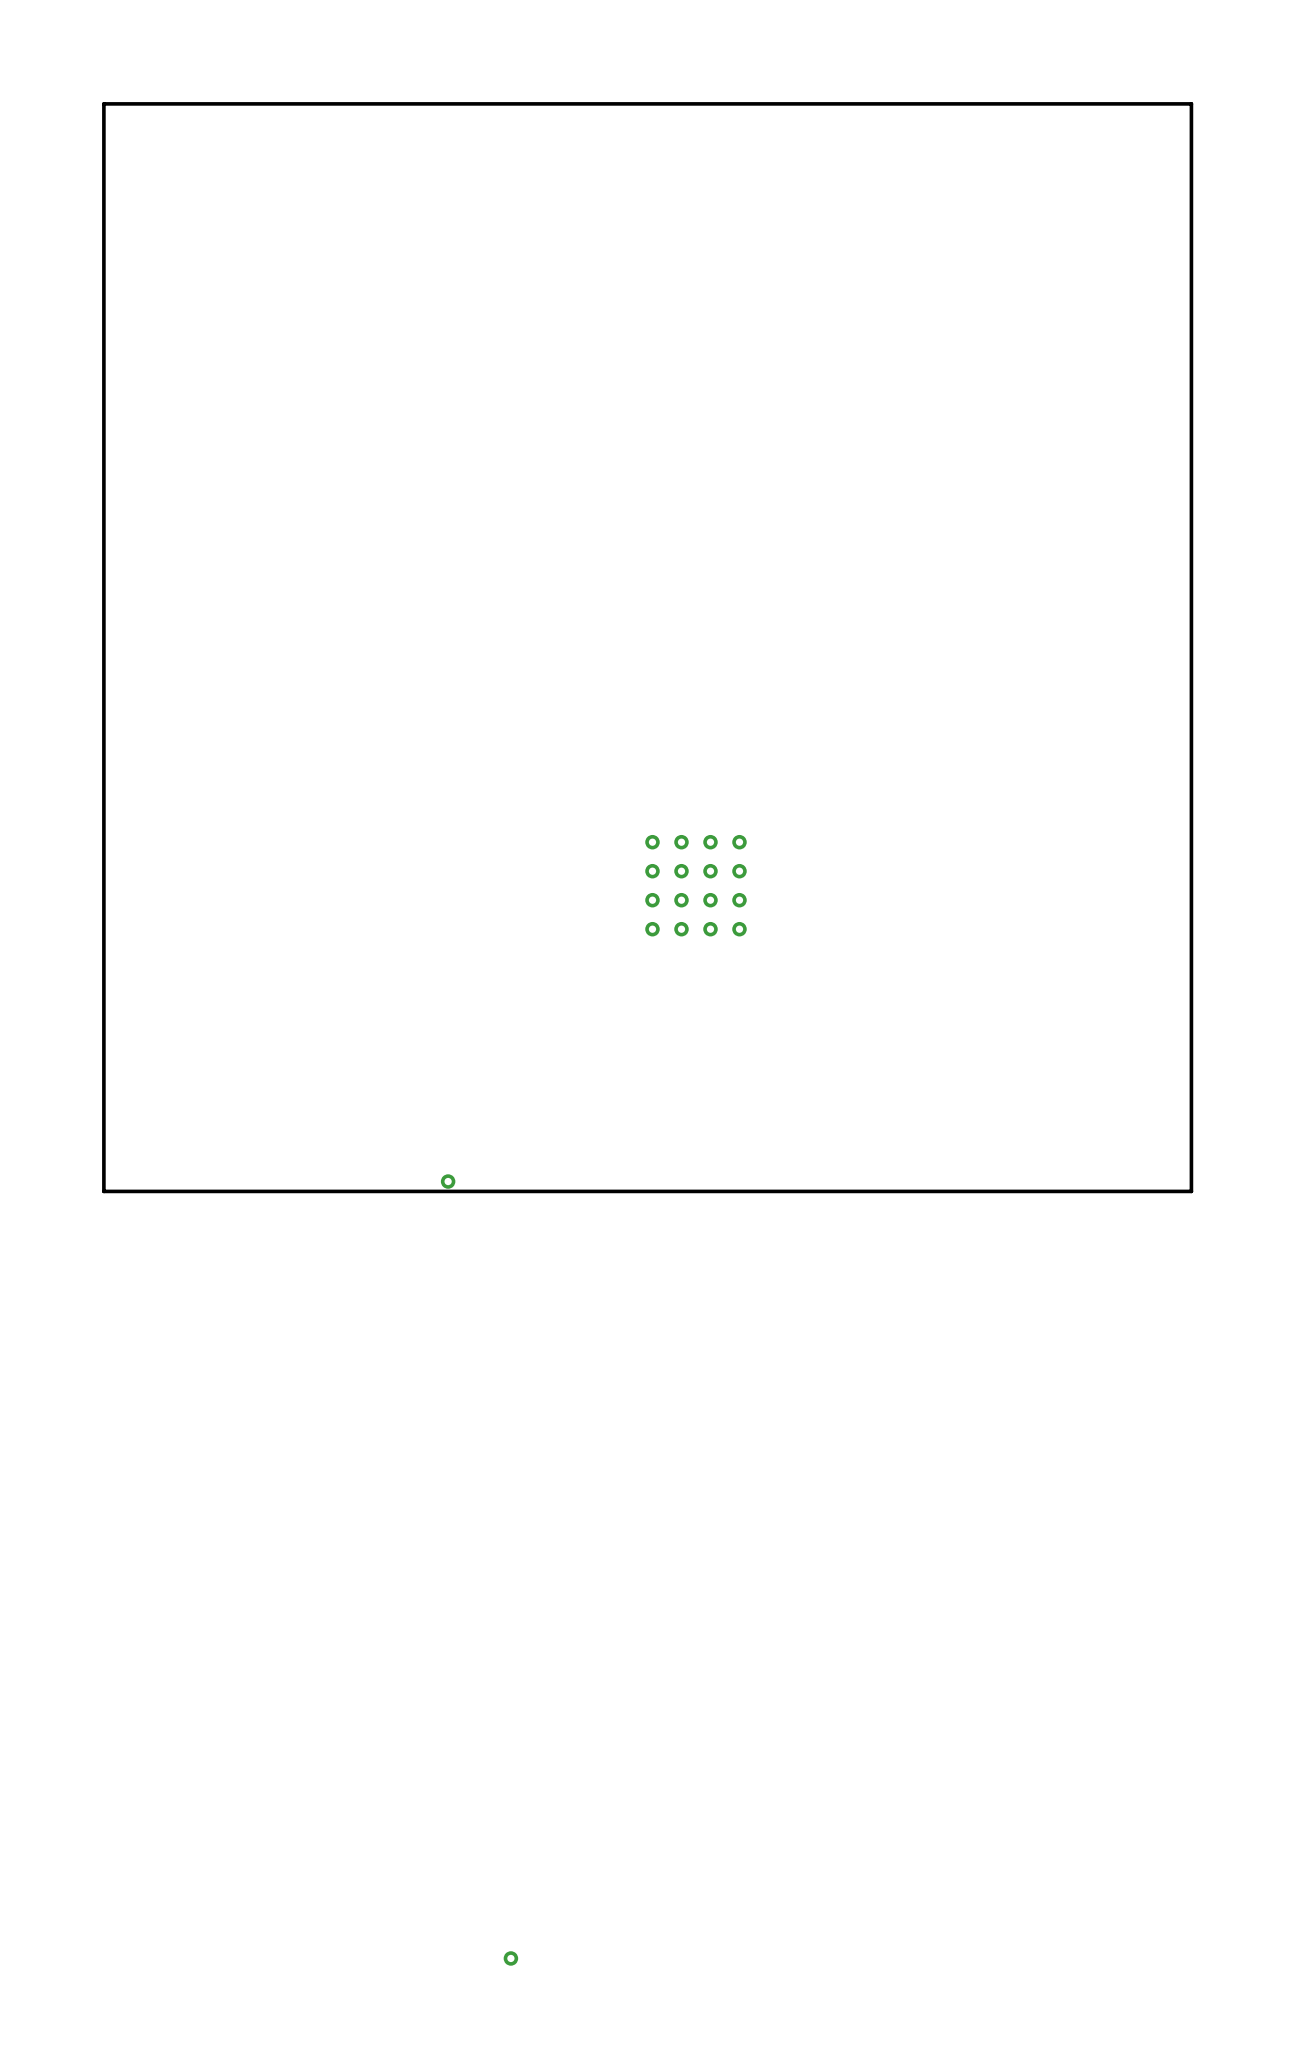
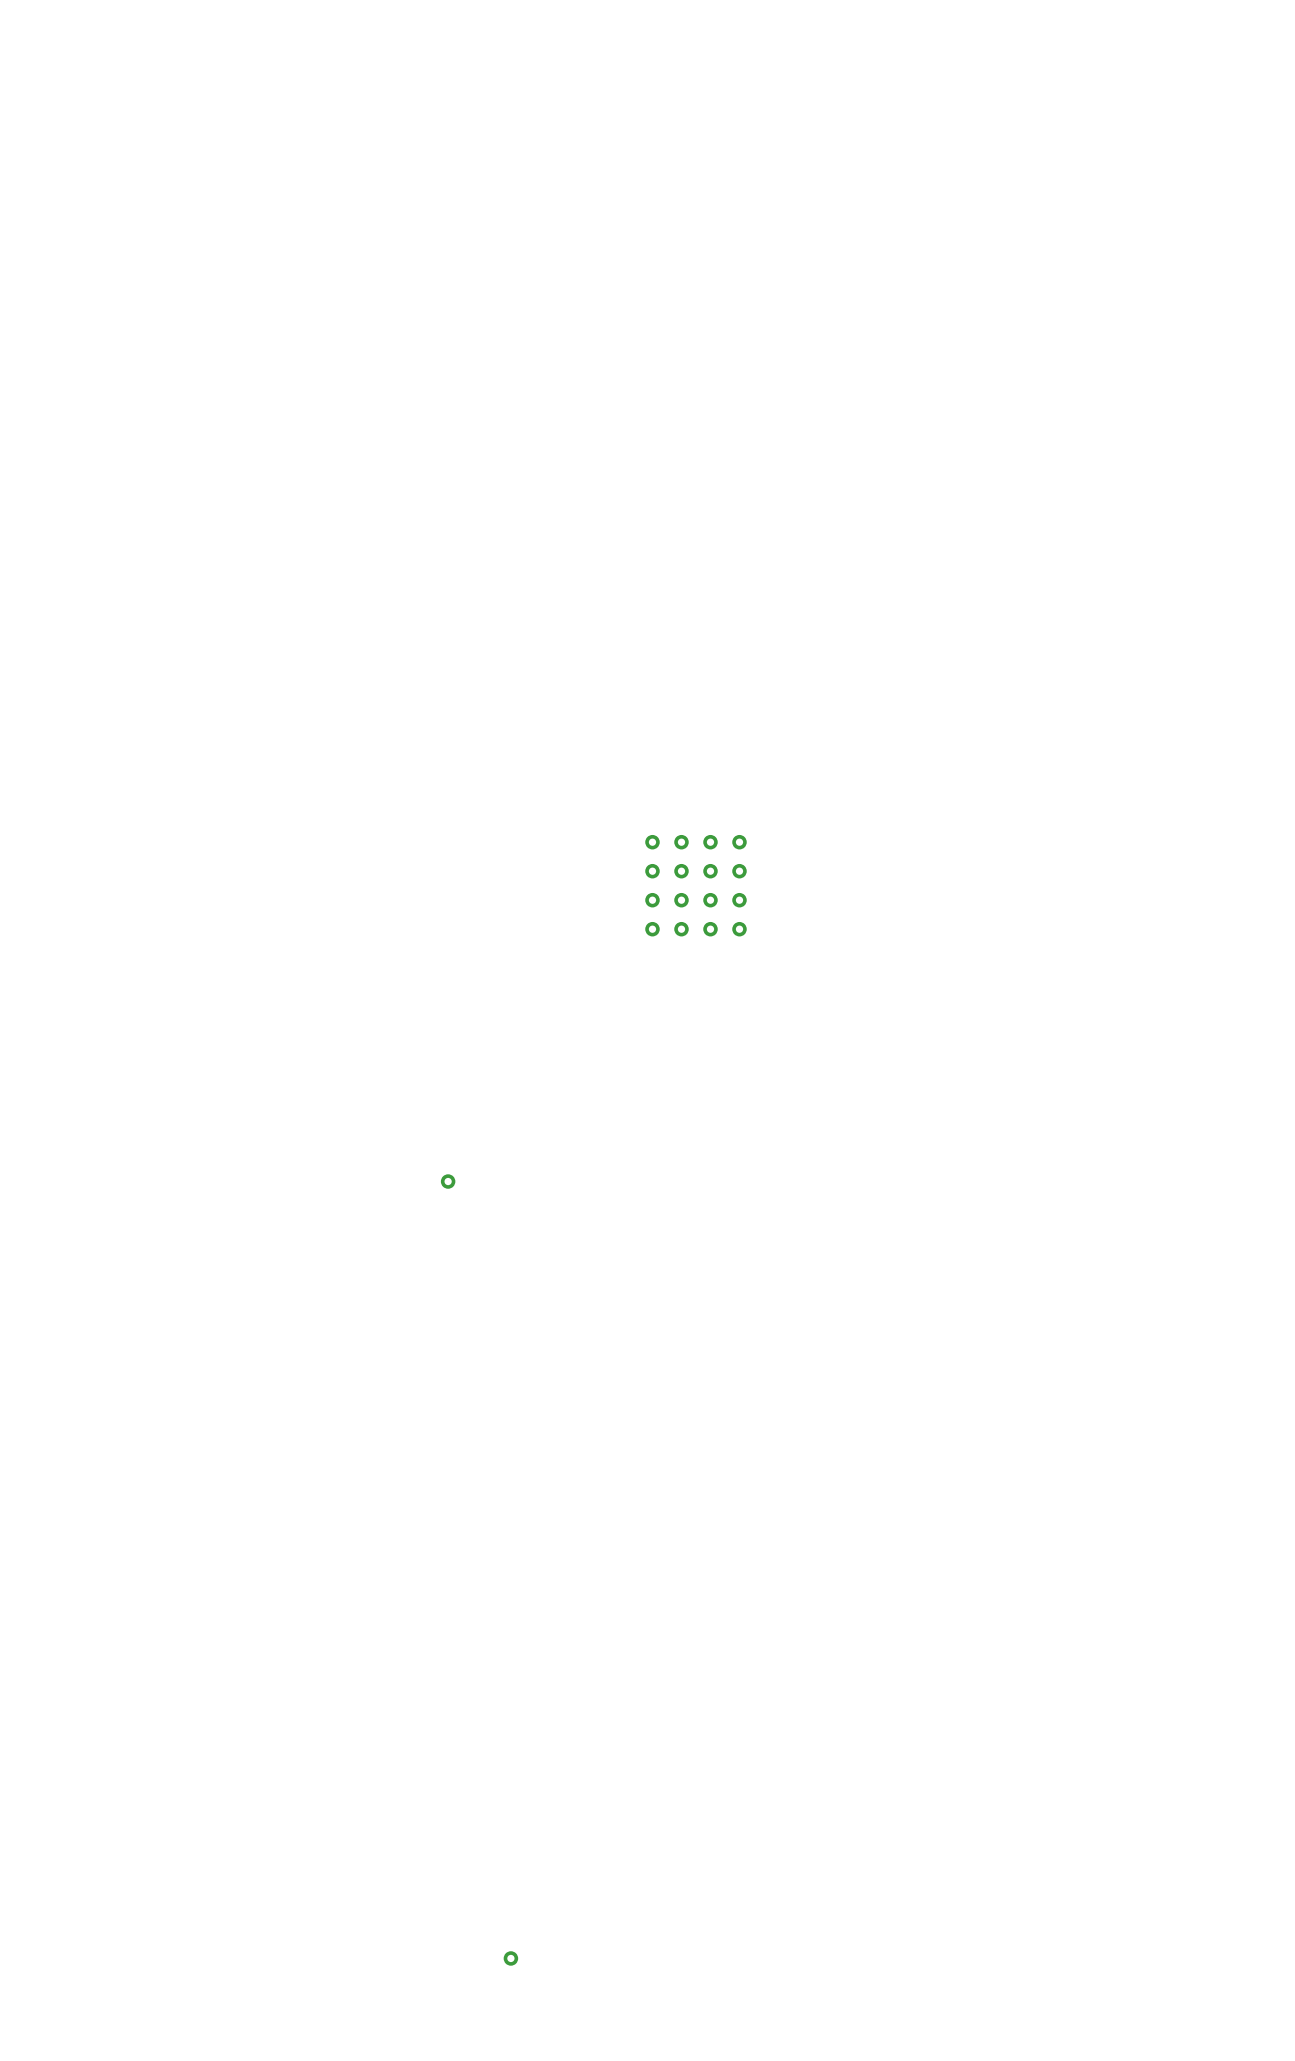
board edge: (1191, 103) (1191, 1191) (103, 1191) (103, 103) (1191, 103) -> none

